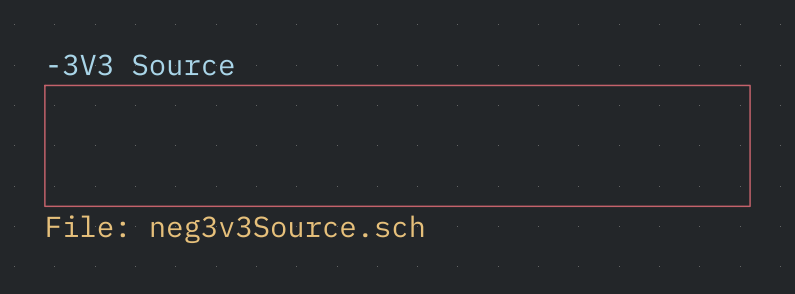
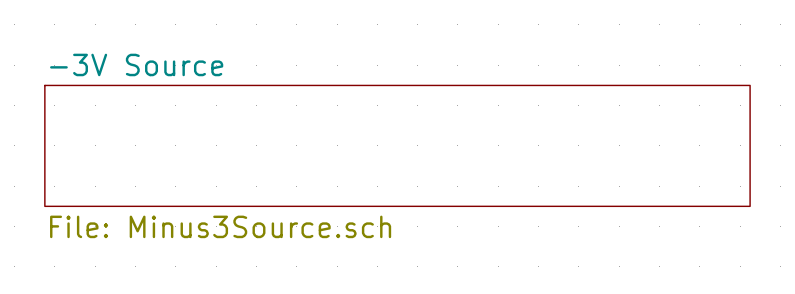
sheet -3V3 Source name: -3V3 Source (141, 64) -> -3V Source (136, 64)
sheet -3V3 Source value: File: neg3v3Source.sch (235, 229) -> File: Minus3Source.sch (220, 226)

